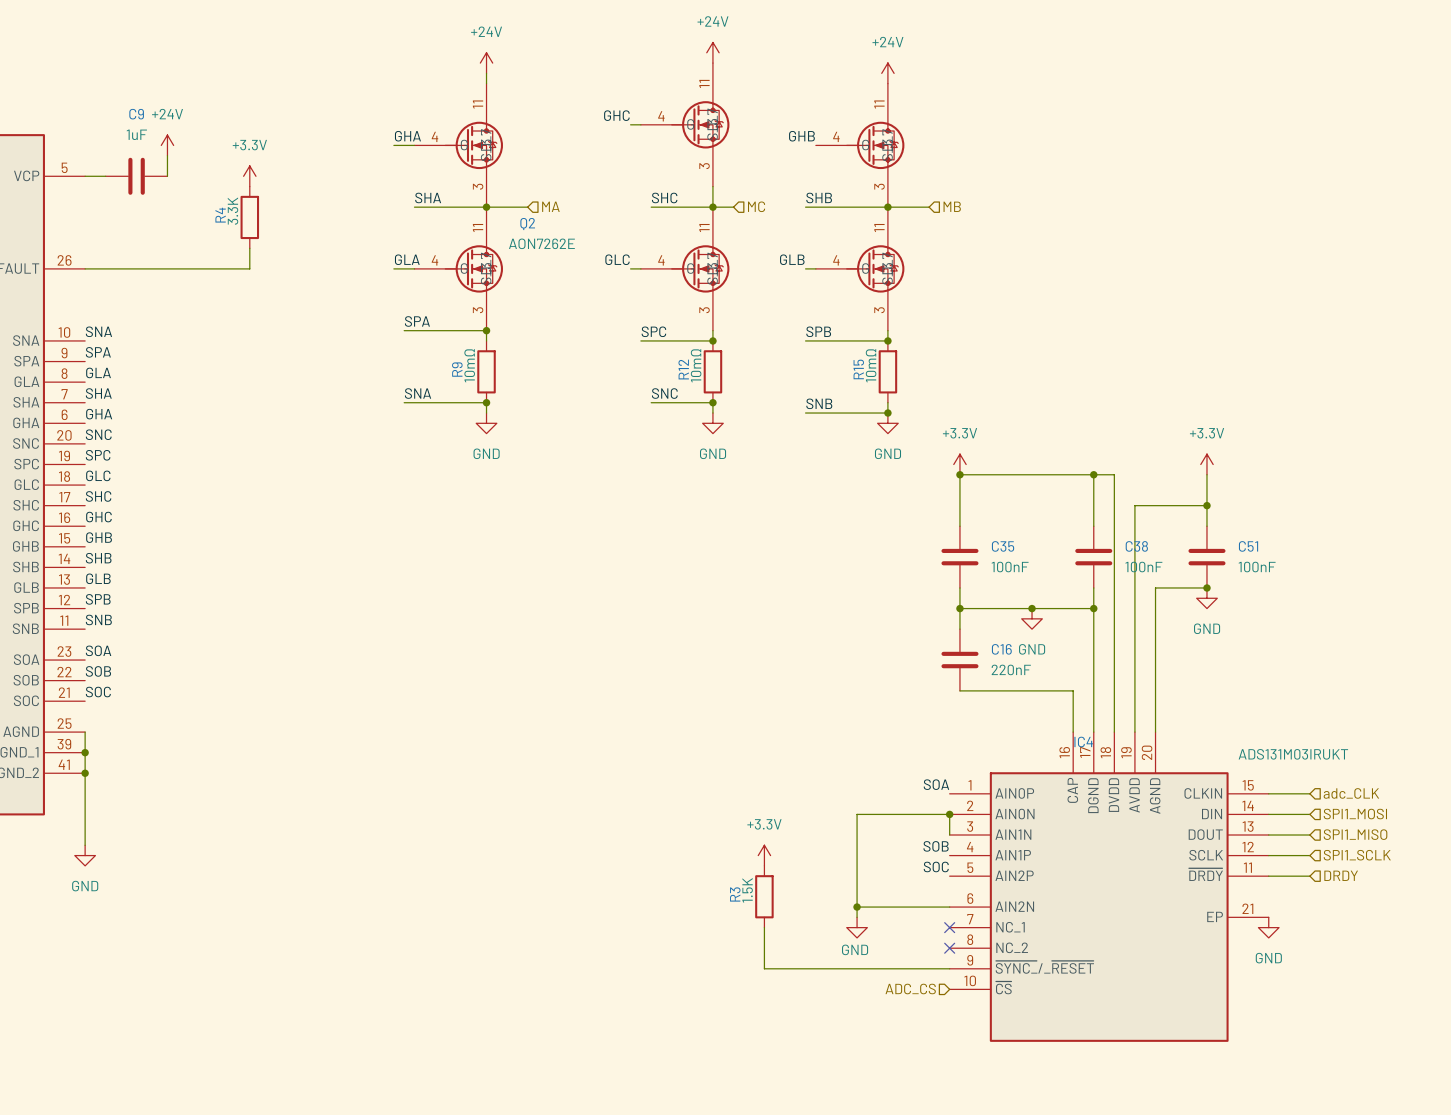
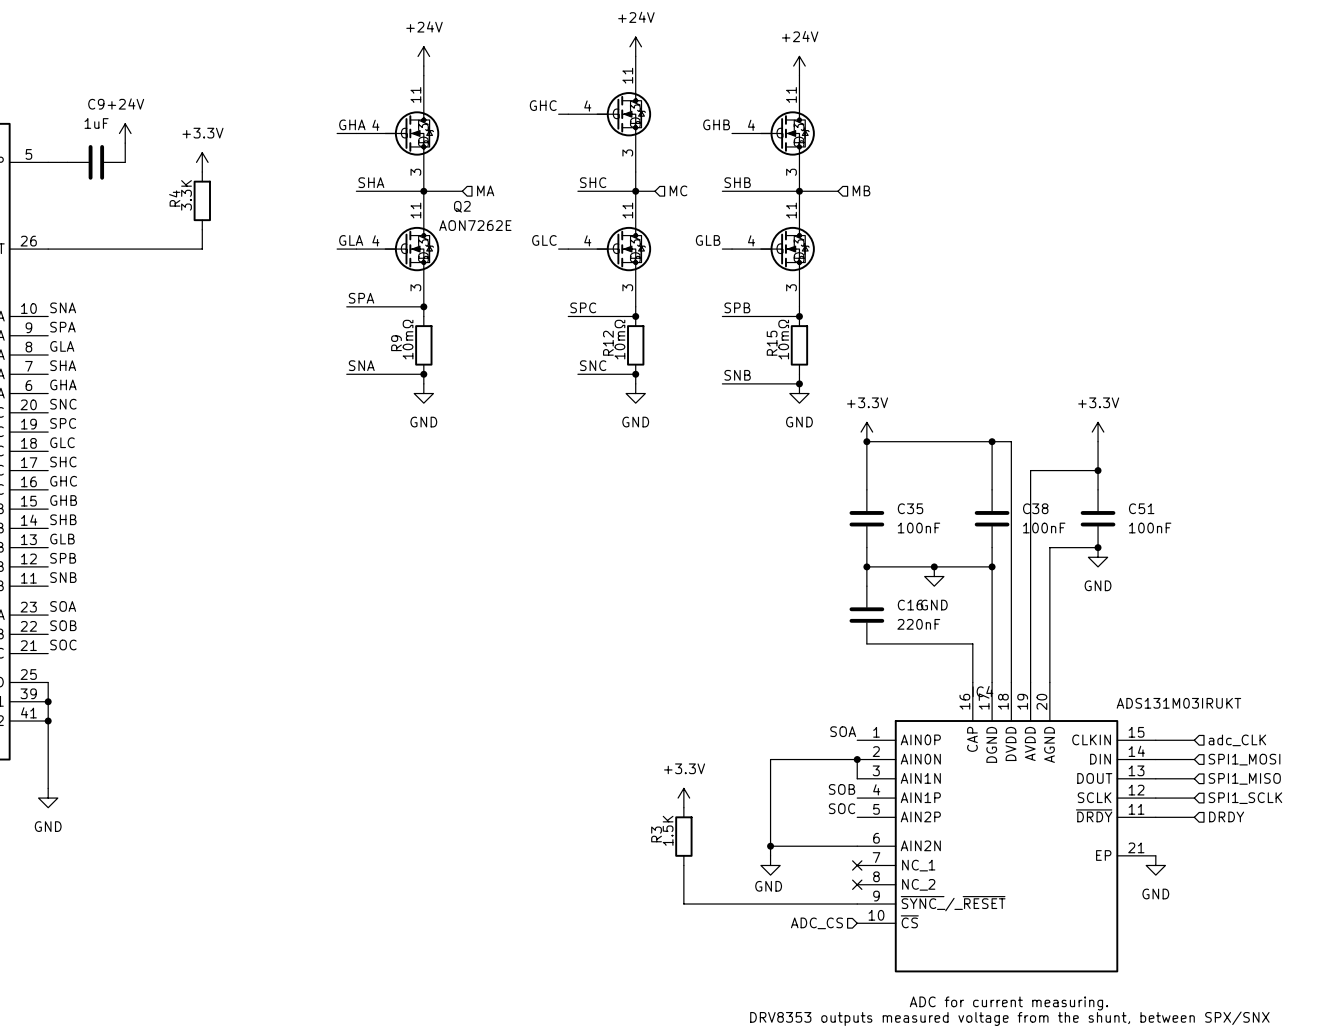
text: none -> ADC for current measuring. (1008, 1003)
text: none -> DRV8353 outputs measured voltage from the shunt, between SPX/SNX (1009, 1018)

